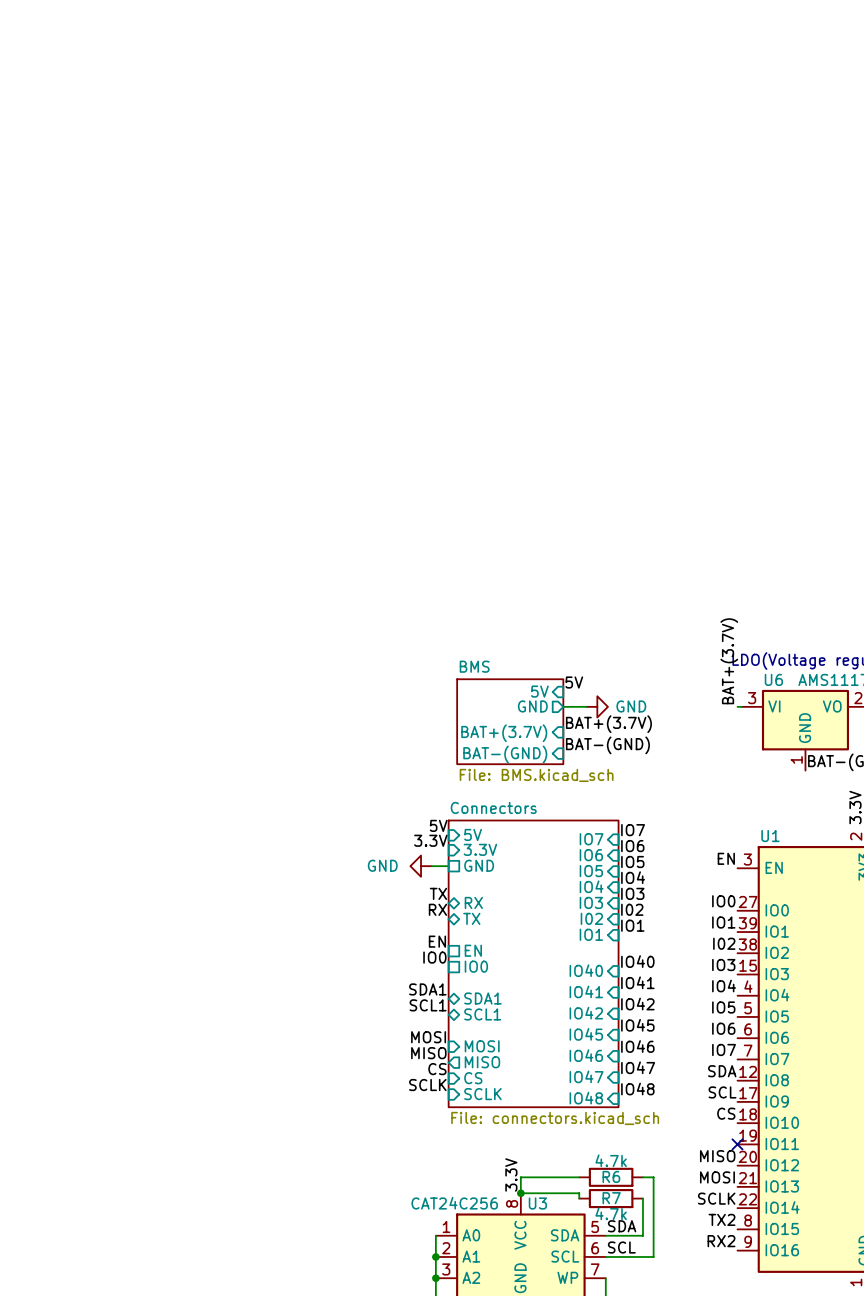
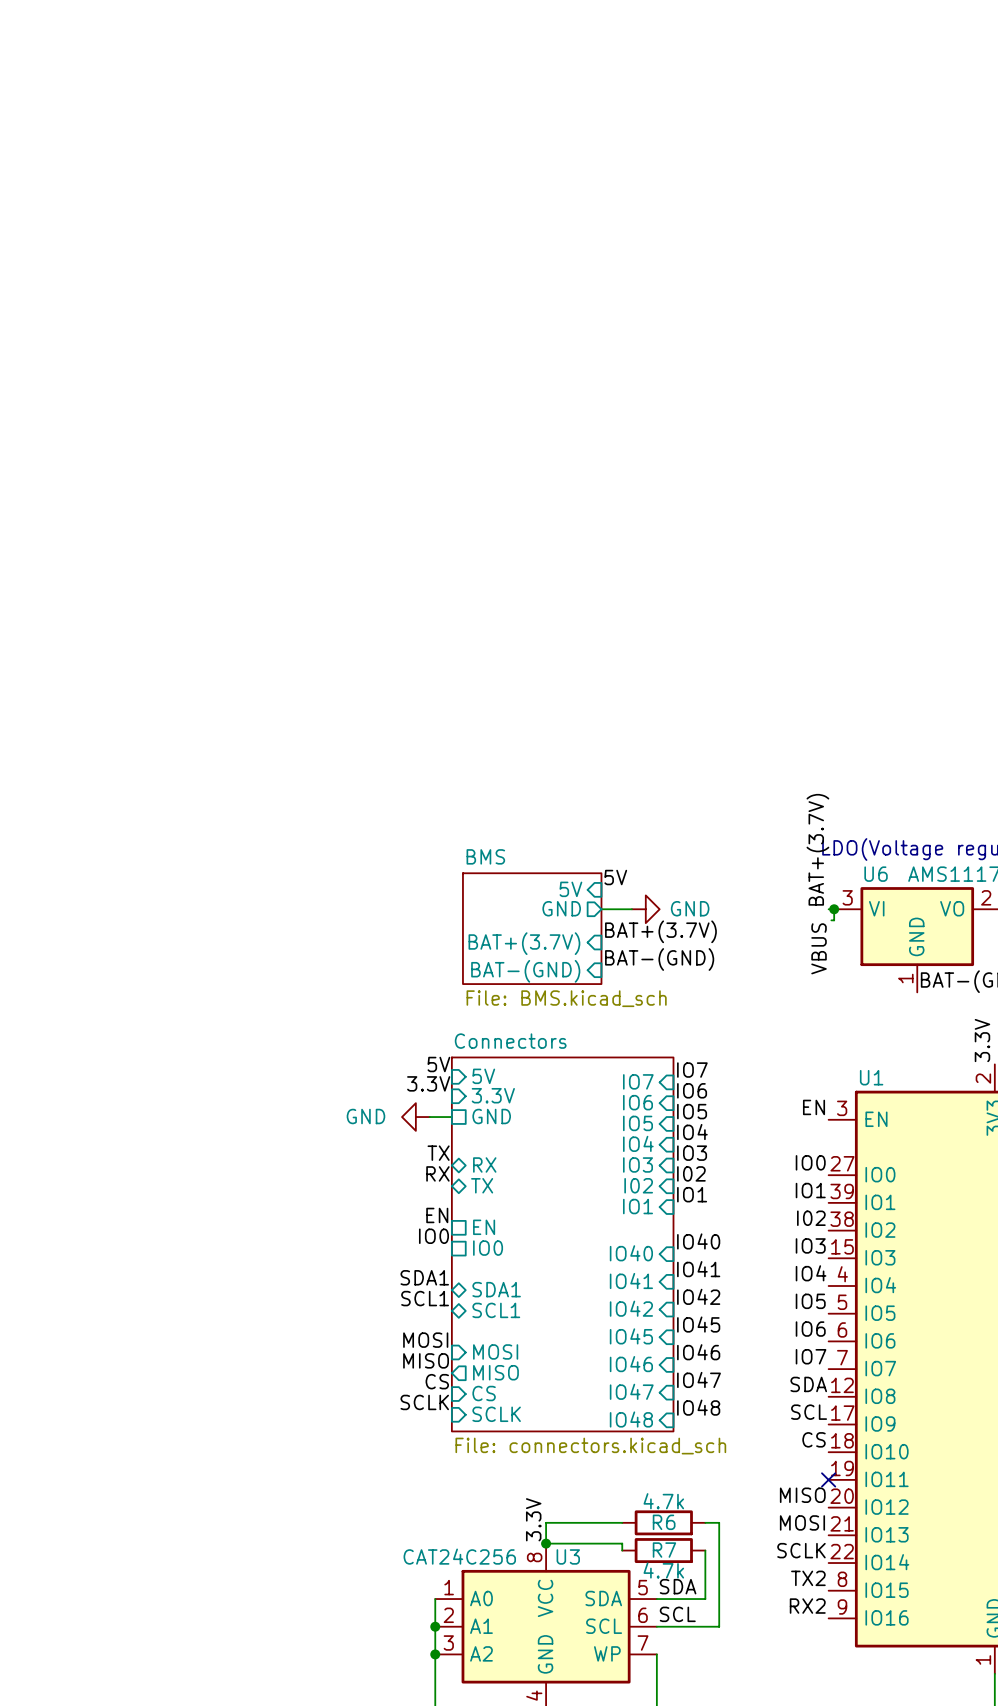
wire: none -> (834, 909) (834, 920) (831, 920)
junction: none -> (834, 909)
label: none -> VBUS (819, 948)

